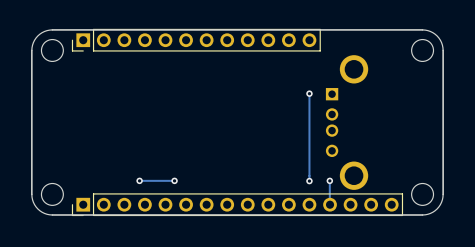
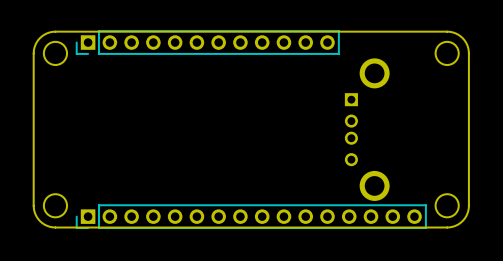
via: (309, 93) -> none
track: (310, 94) (309, 181) -> none
via: (139, 180) -> none
track: (174, 180) (139, 180) -> none
via: (174, 180) -> none
track: (329, 180) (329, 204) (332, 202) -> none
via: (329, 180) -> none
via: (309, 181) -> none

